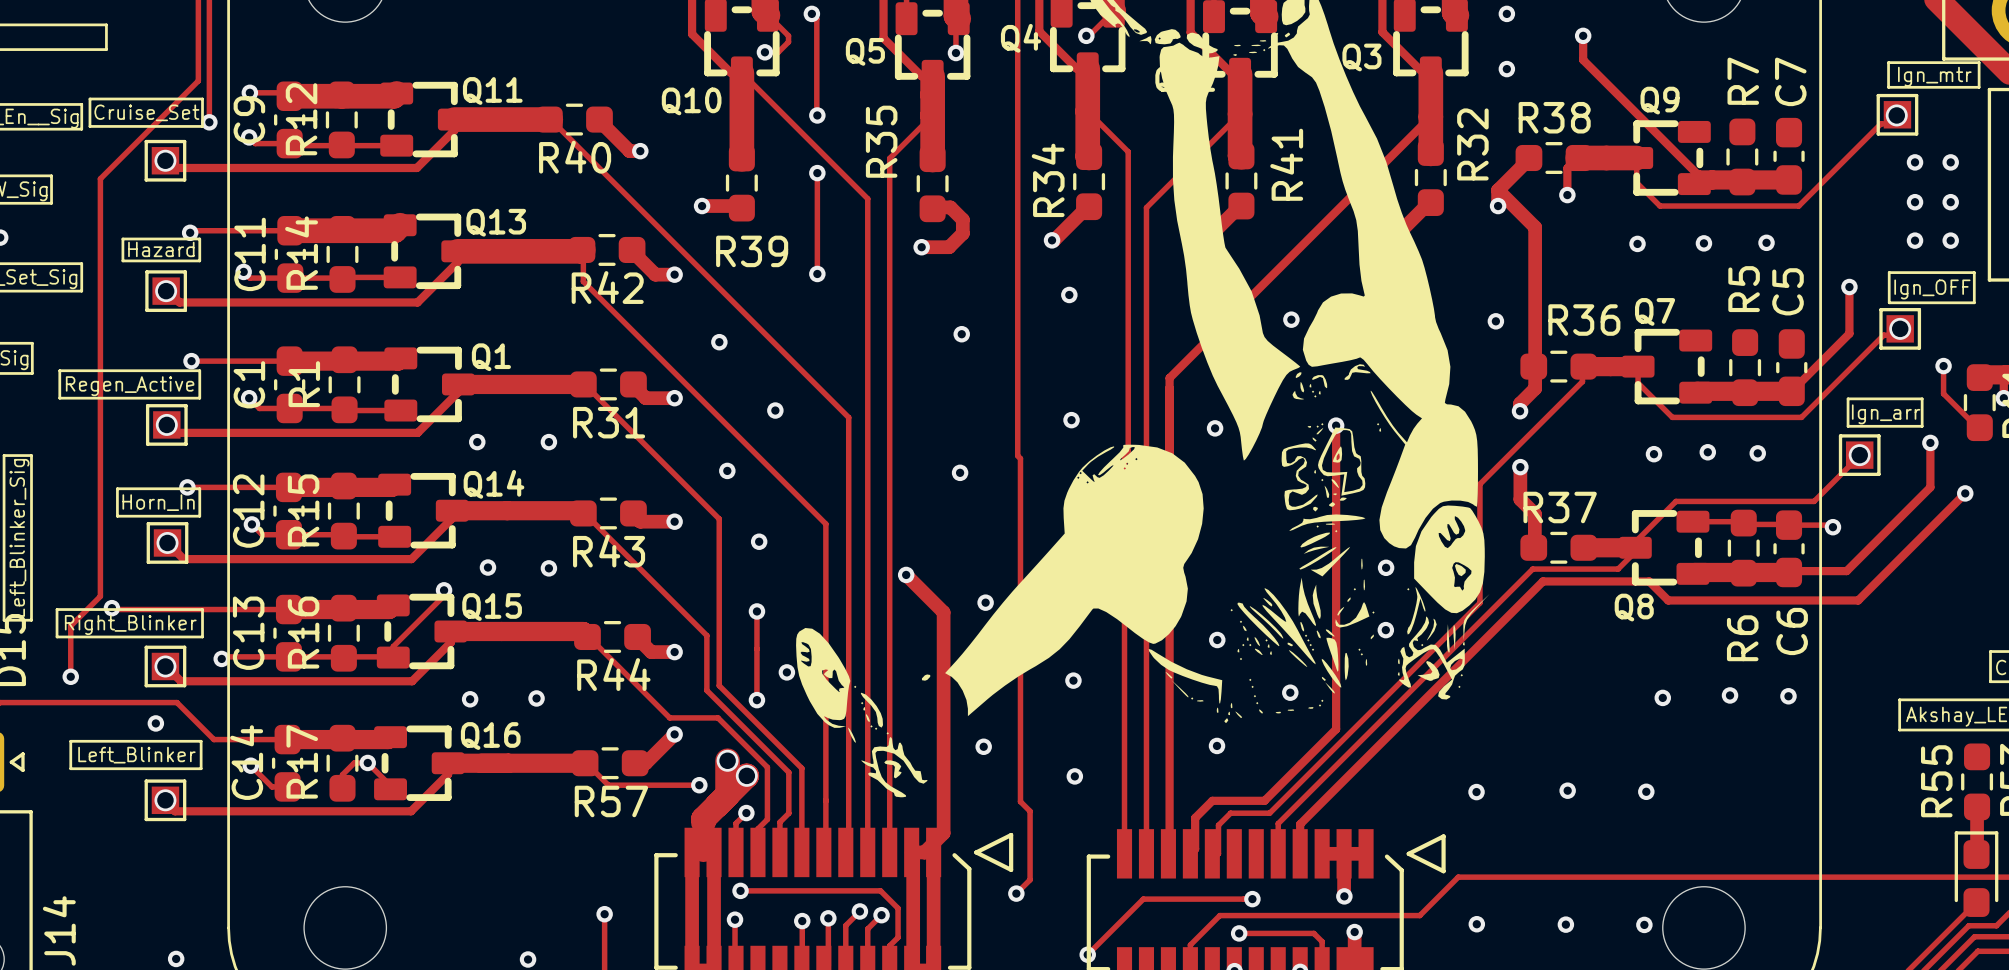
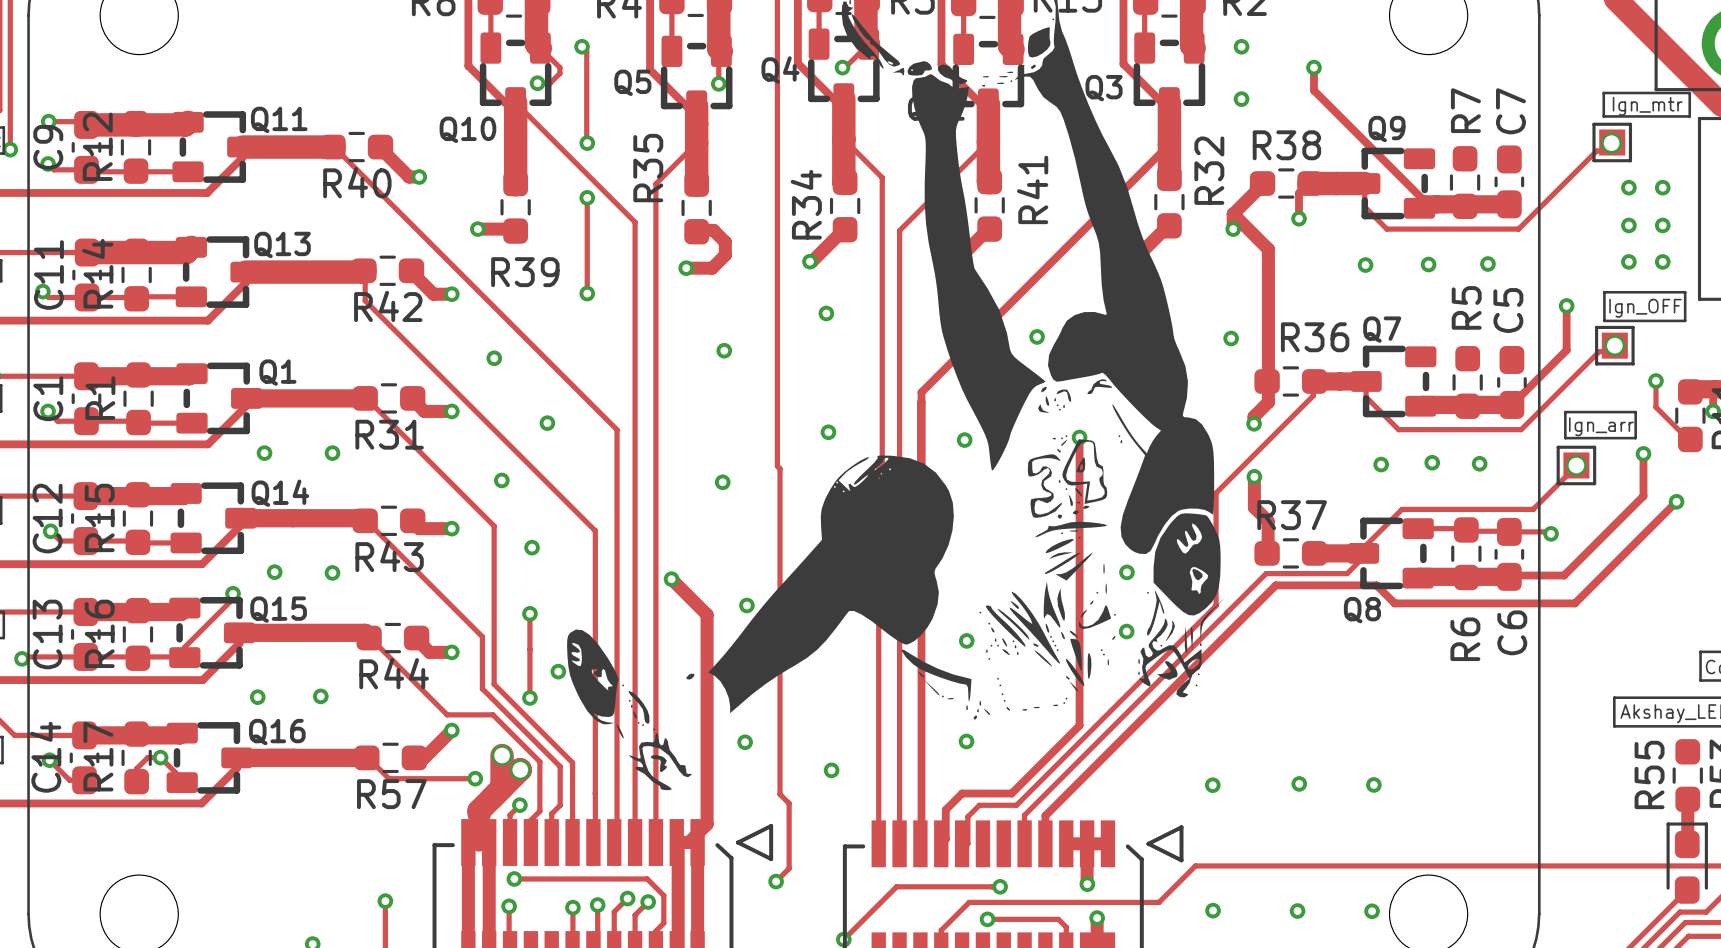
via: (1073, 680) -> none
via: (1290, 692) -> none
via: (1730, 695) -> none
via: (1788, 696) -> none
via: (1662, 697) -> none

